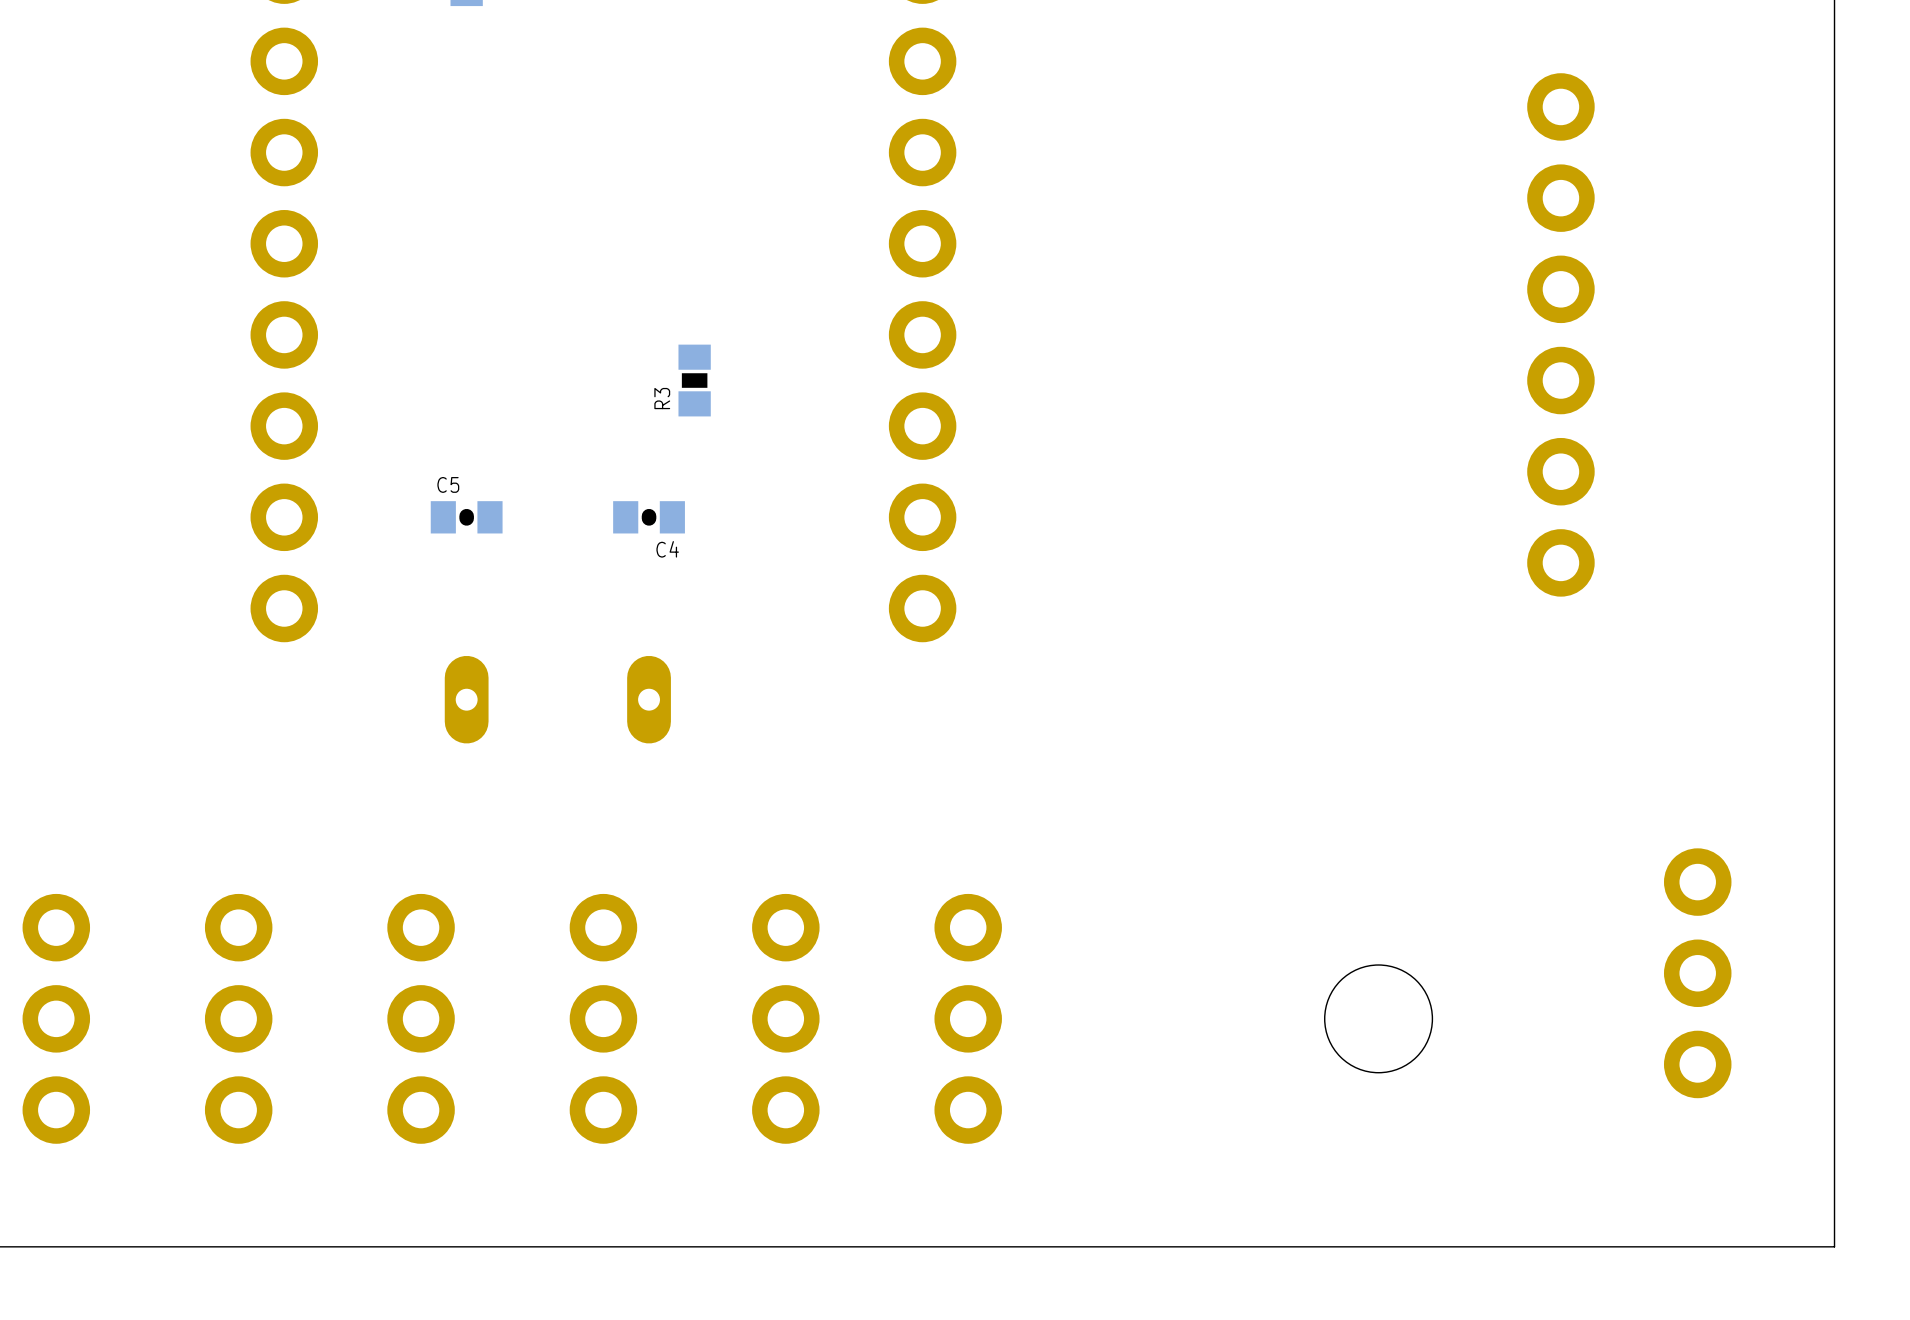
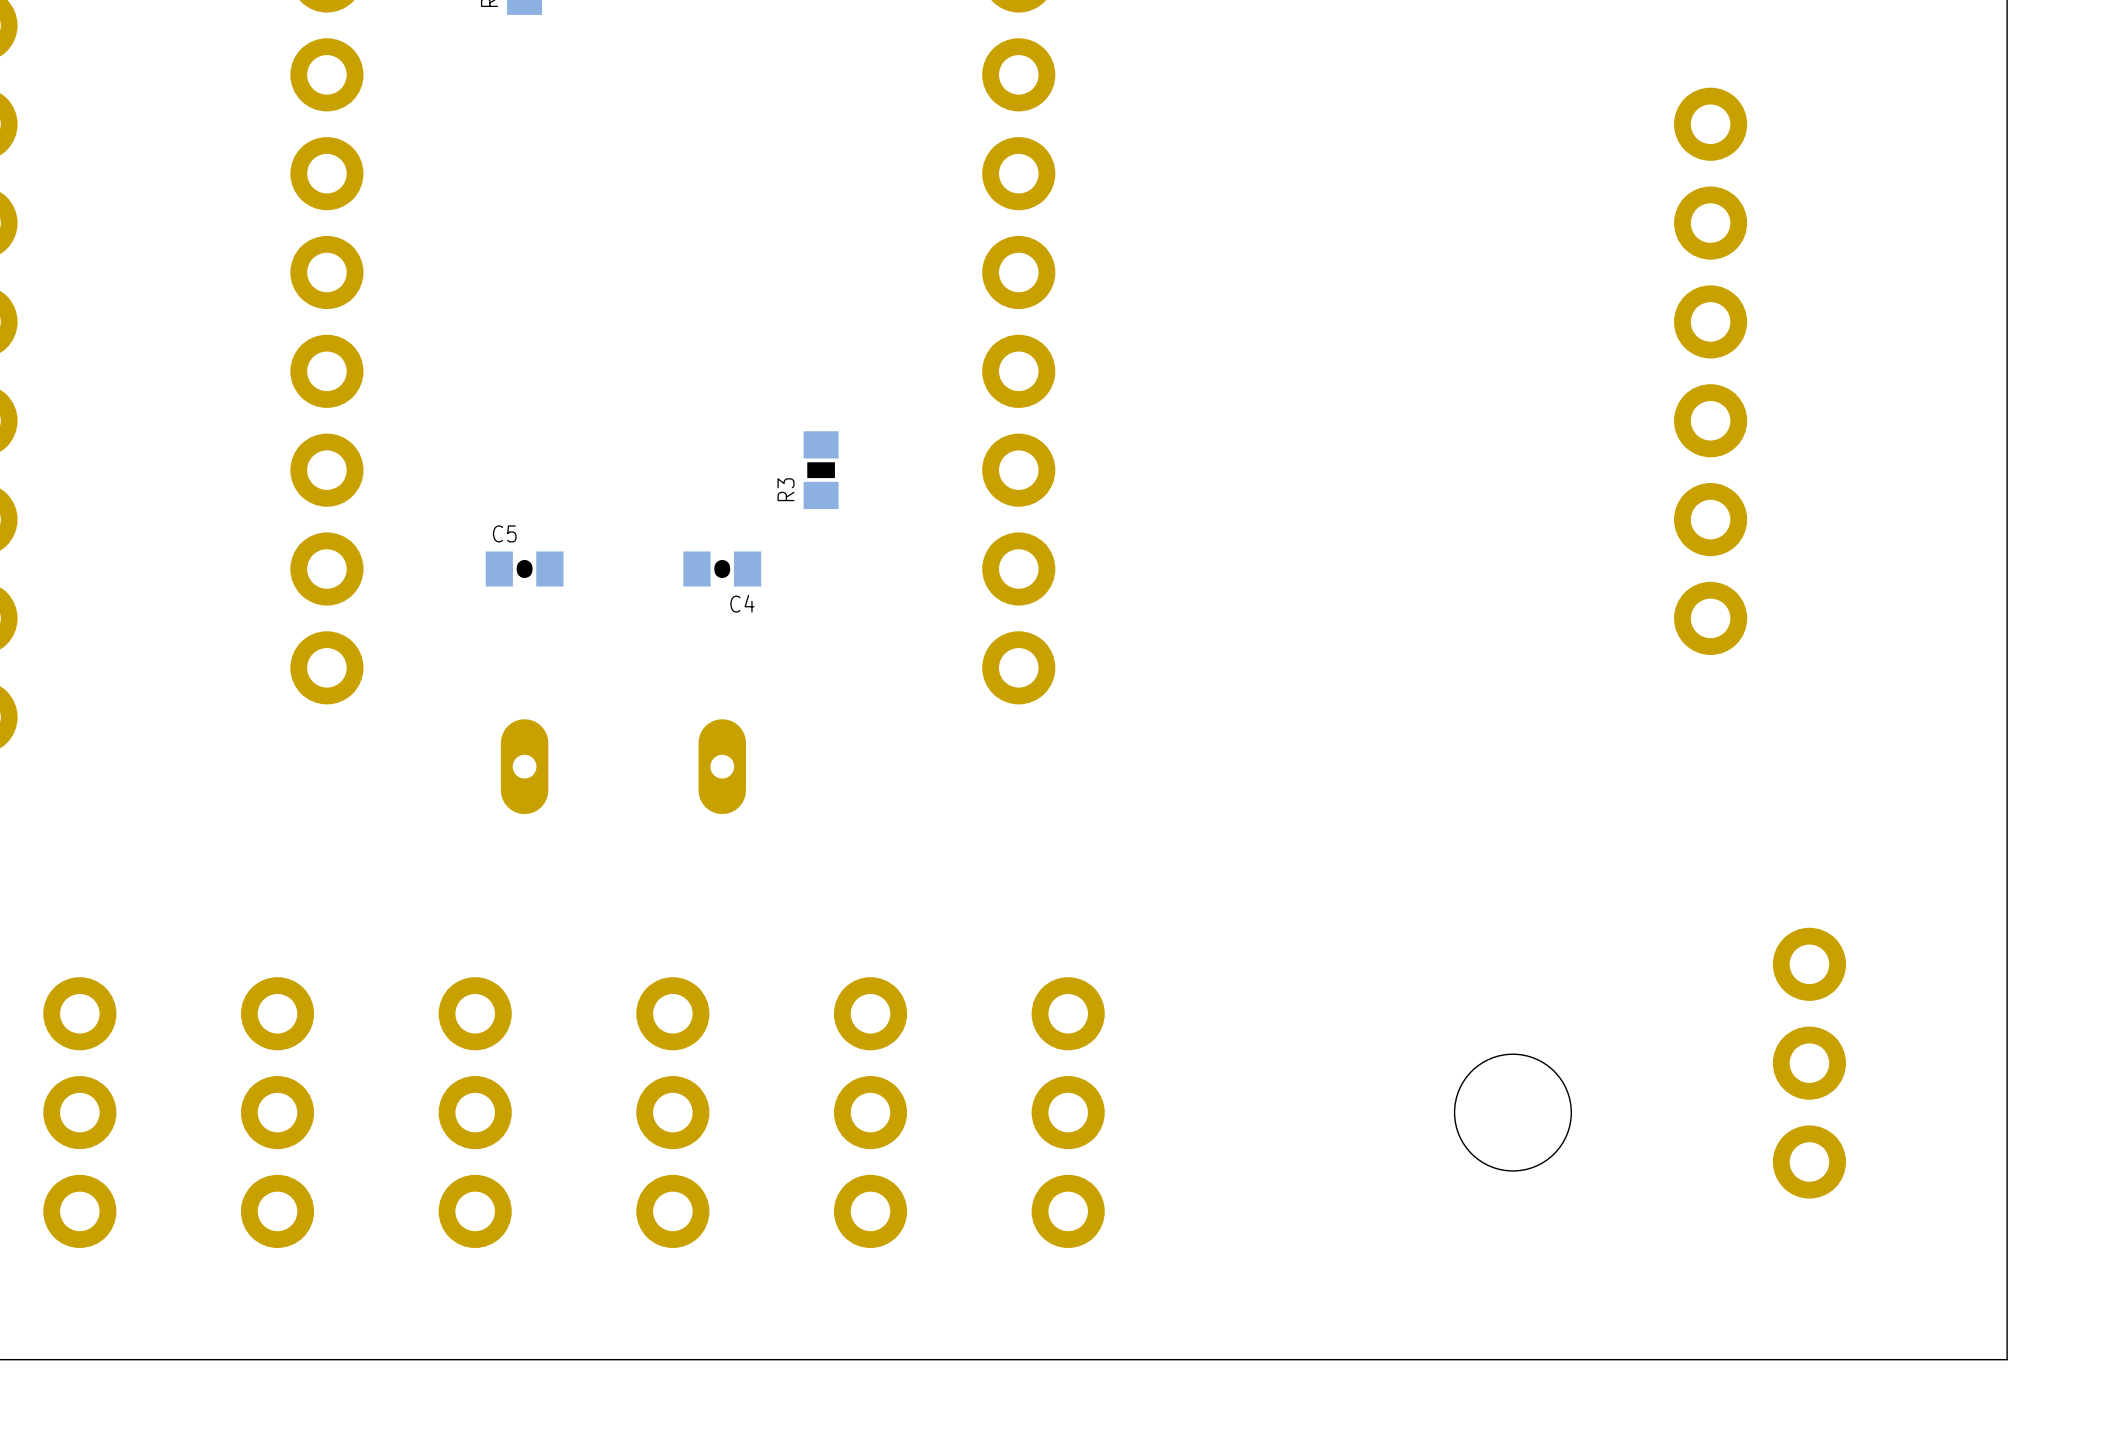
R3 position: (694, 380) -> (821, 470)
part position: (1697, 973) -> (1809, 1063)

